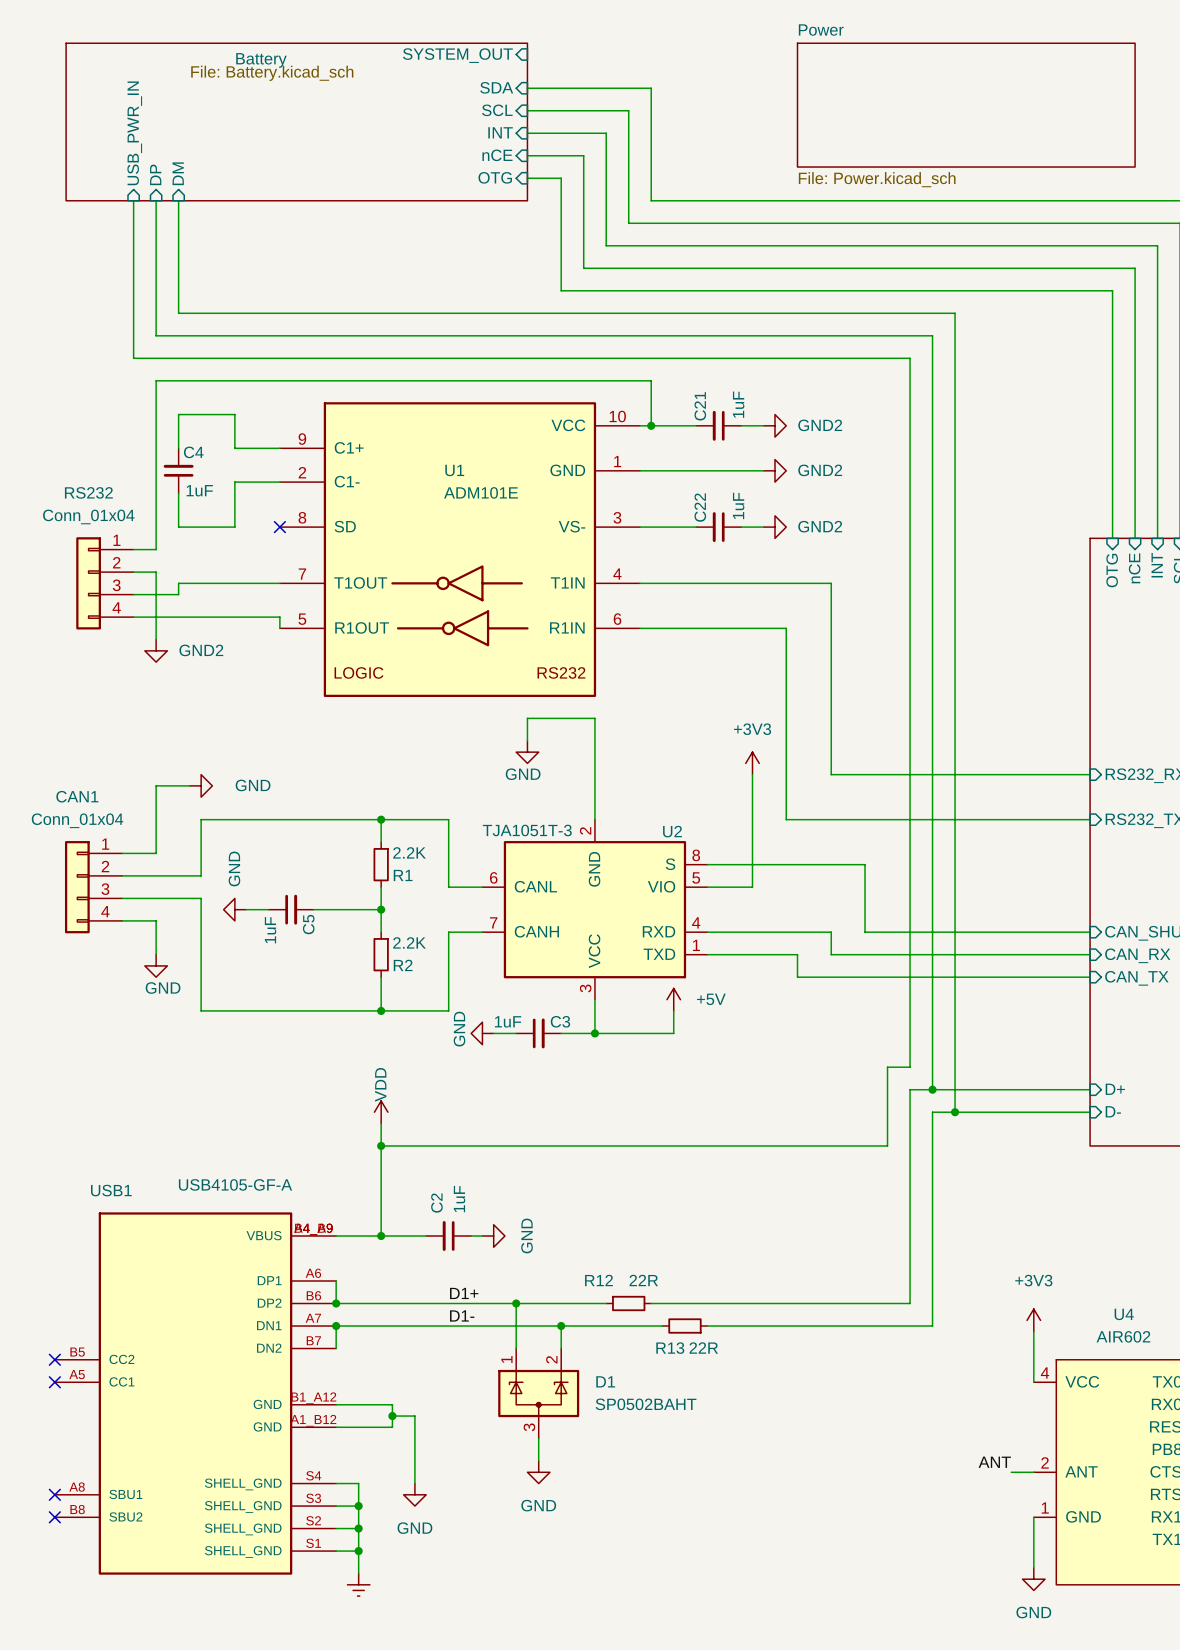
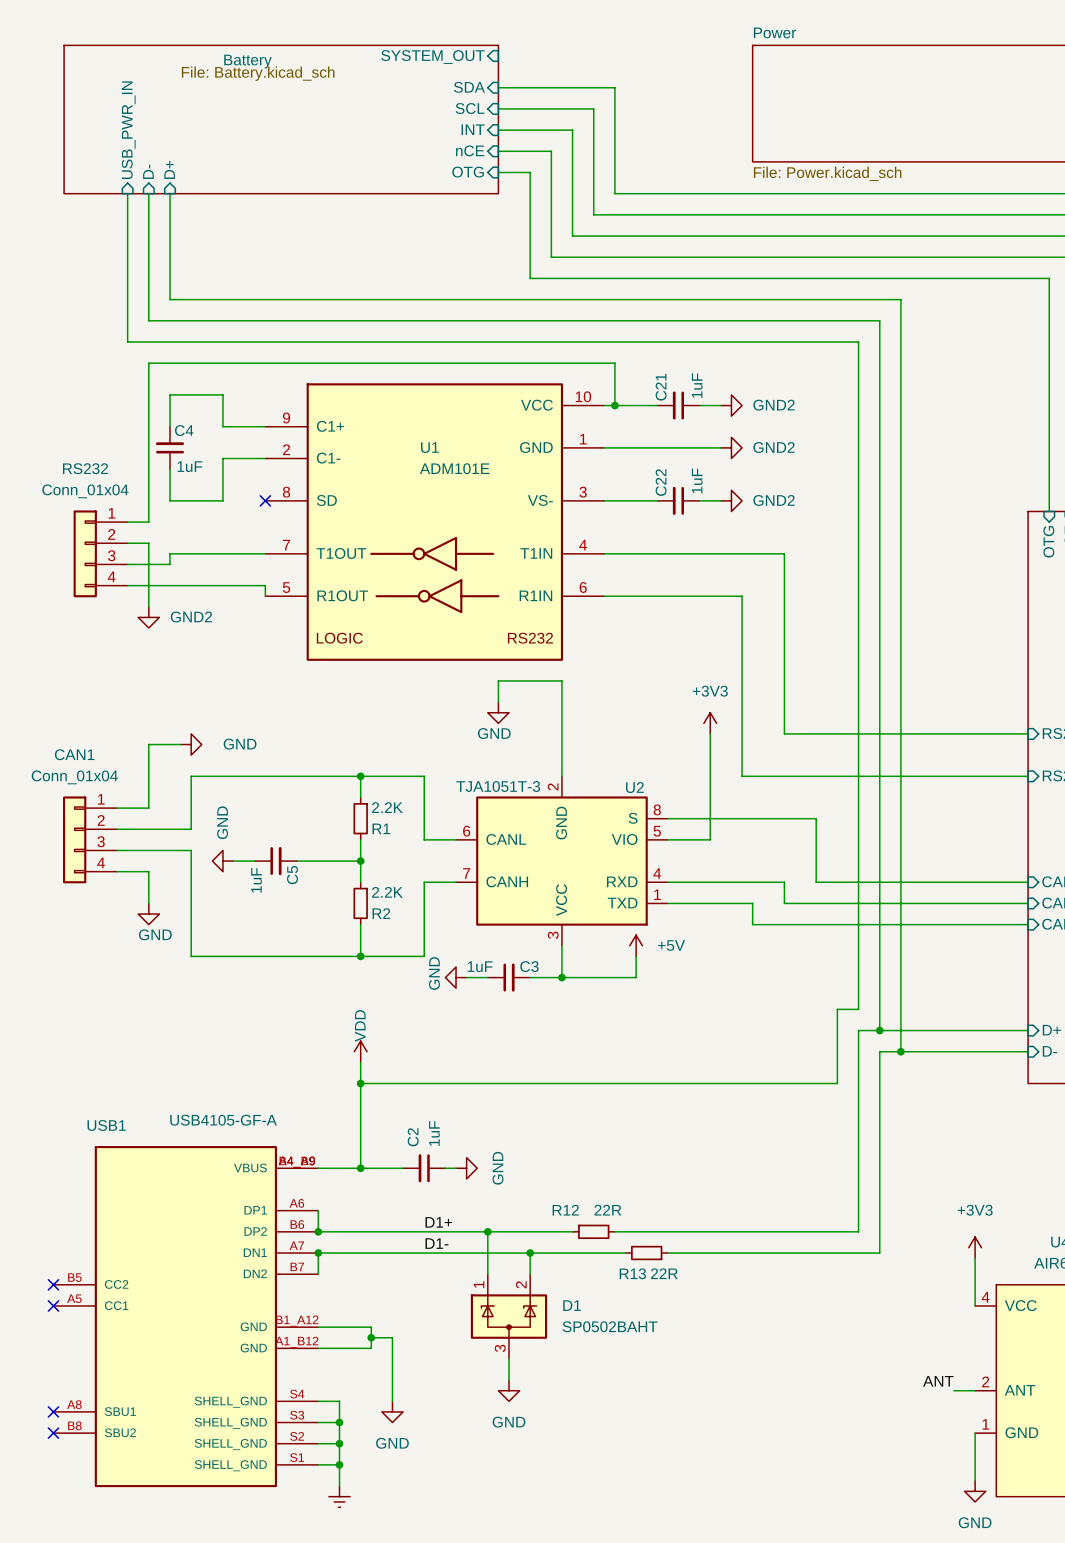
sheet pin: DM (178, 173) -> D+ (169, 169)
sheet pin: DP (155, 174) -> D- (148, 171)

